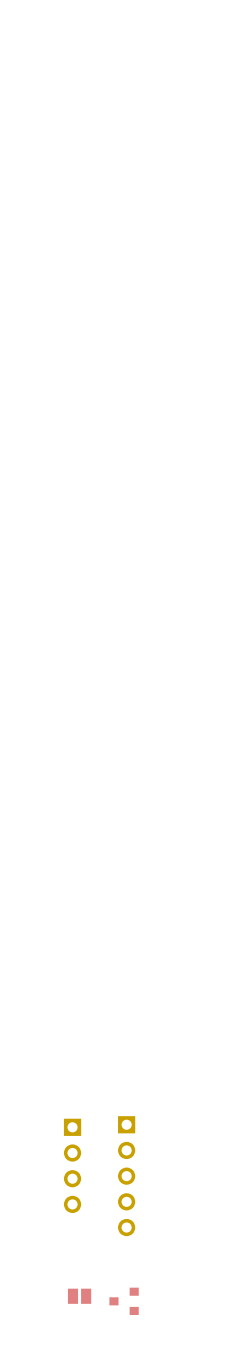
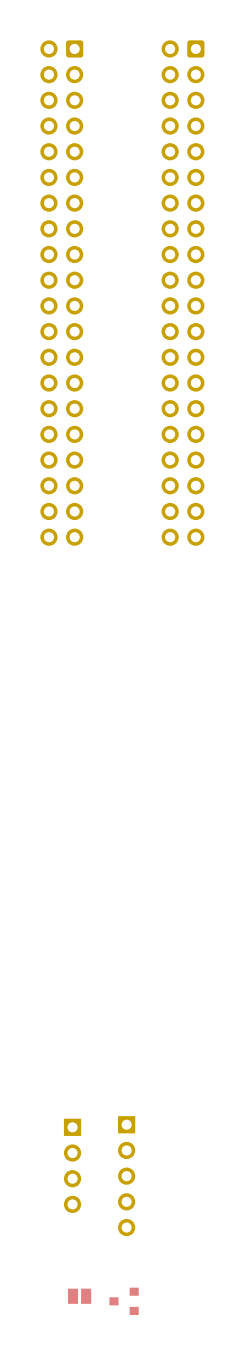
part: none -> (61, 293)
part: none -> (183, 293)

